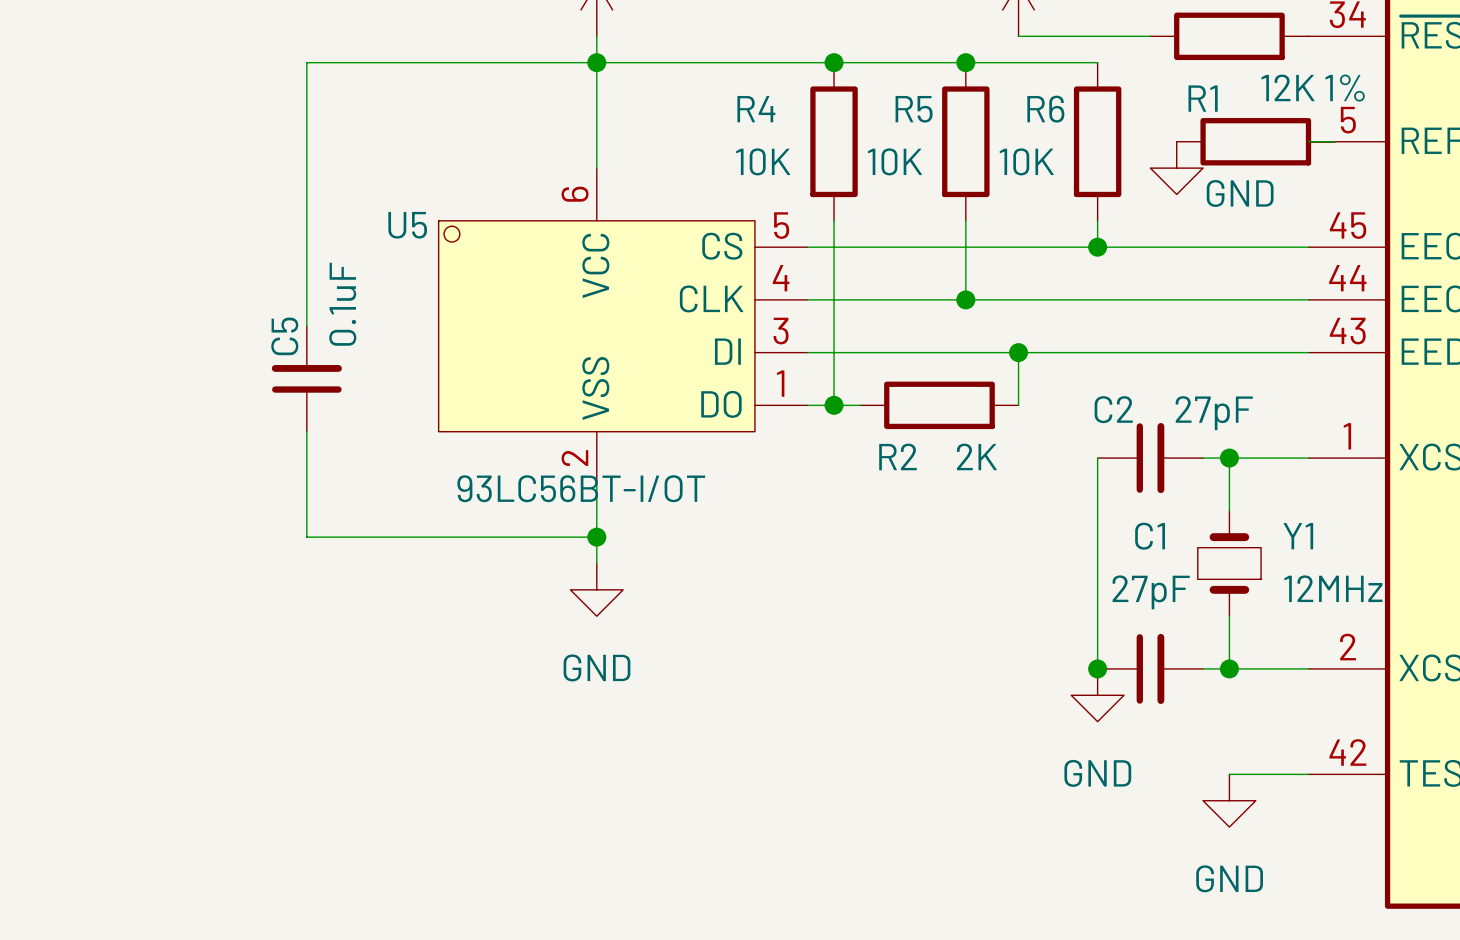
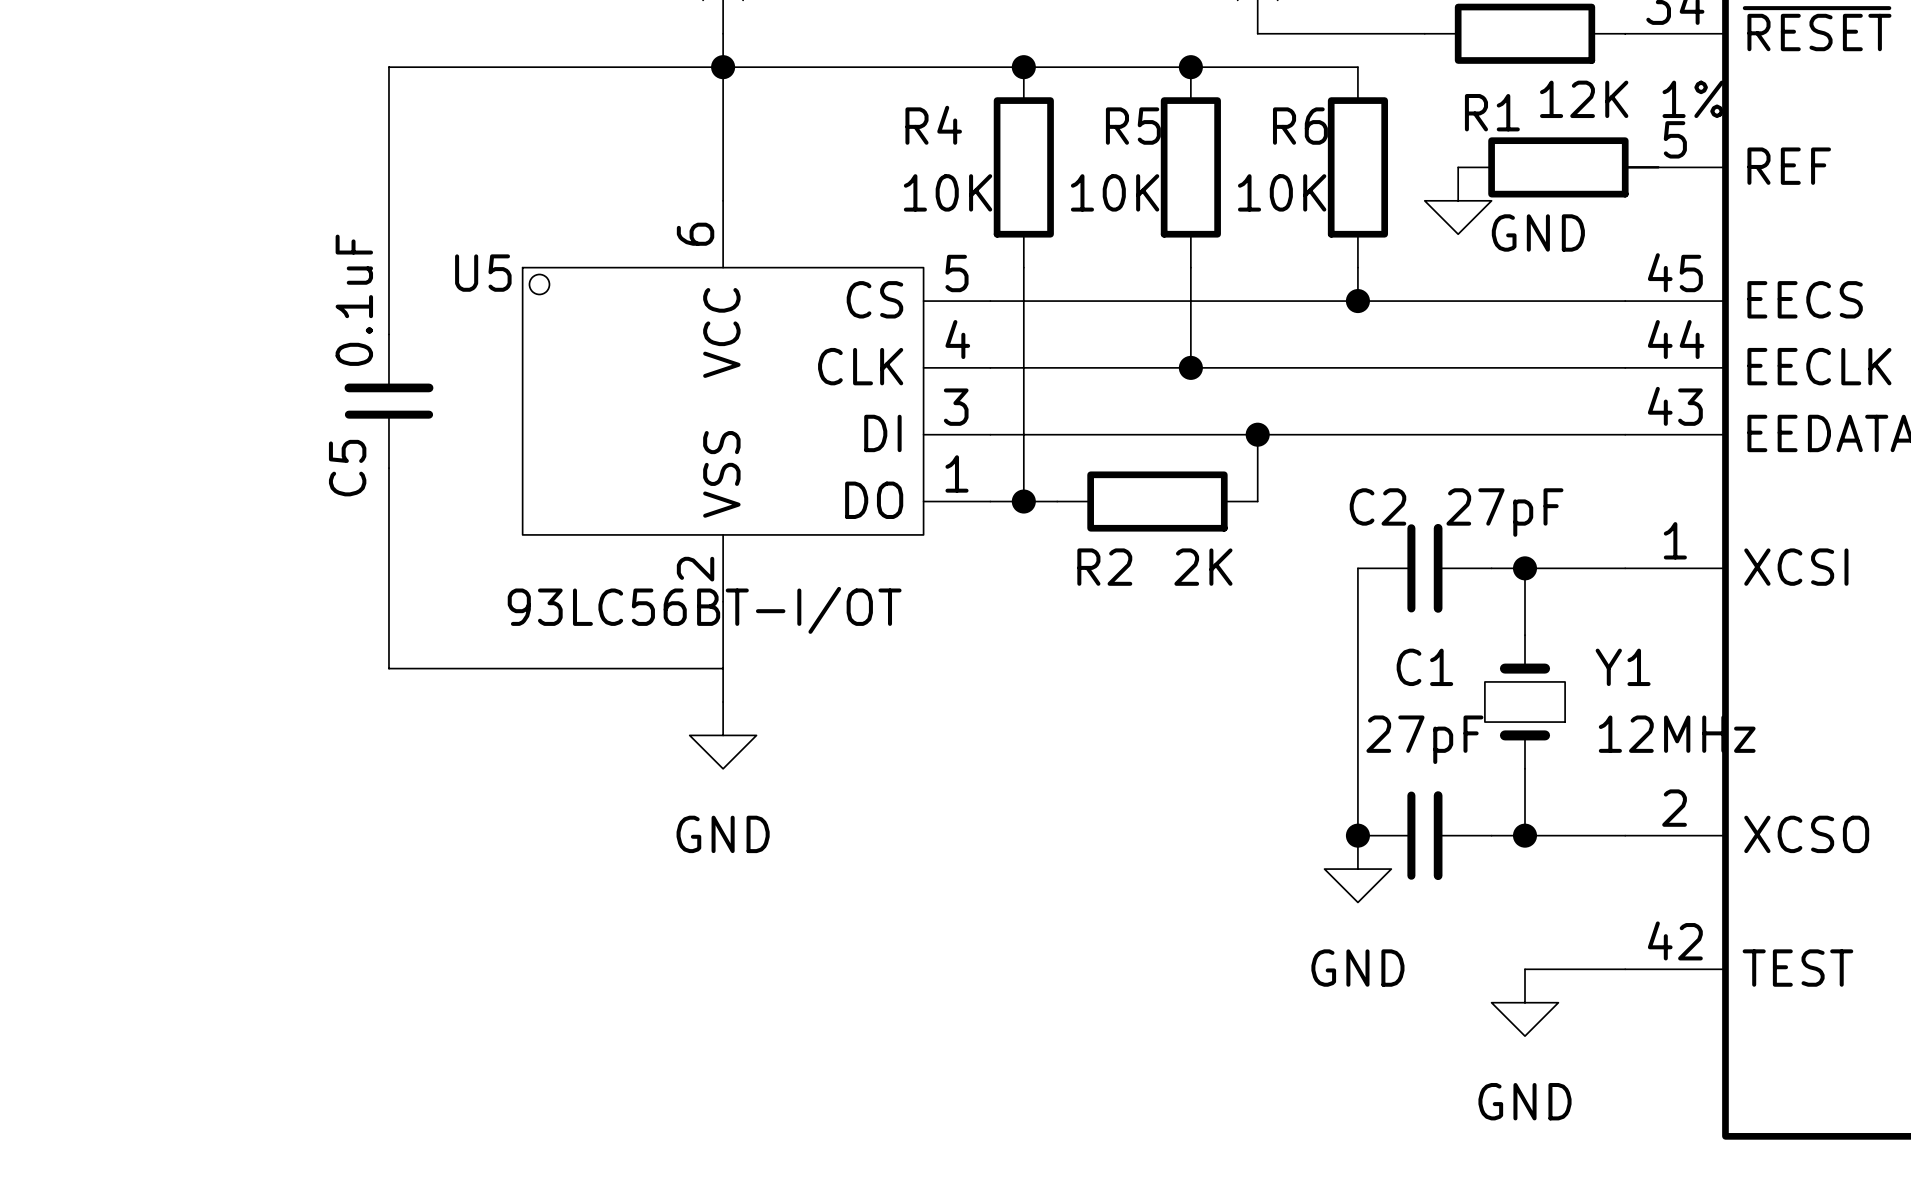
wire: (333, 62) (306, 62) (306, 326) -> (388, 67) (388, 334)
C5 value position: 0.1uF (342, 304) -> 0.1uF (354, 300)
C5 name position: C5 (284, 336) -> C5 (347, 468)
C5 position: (306, 378) -> (388, 401)
wire: (306, 431) (306, 537) (333, 537) -> (388, 468) (388, 668)
junction: (596, 537) -> none

